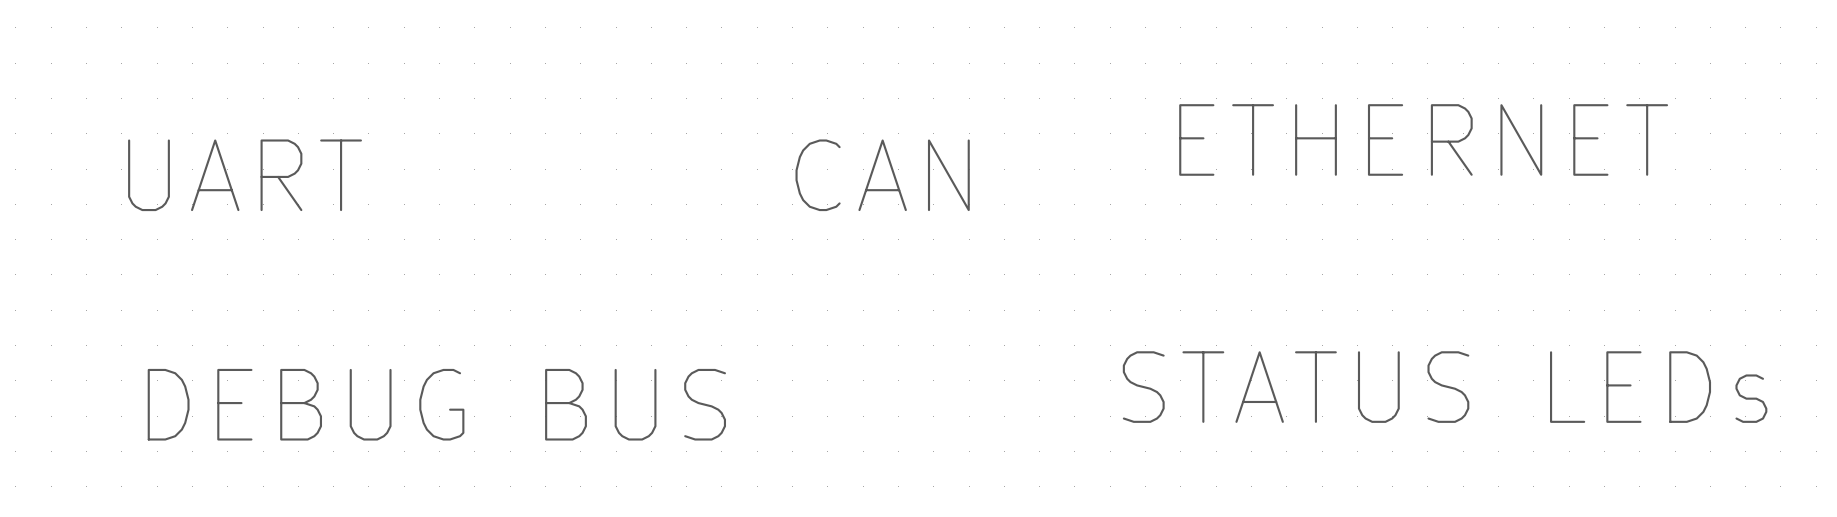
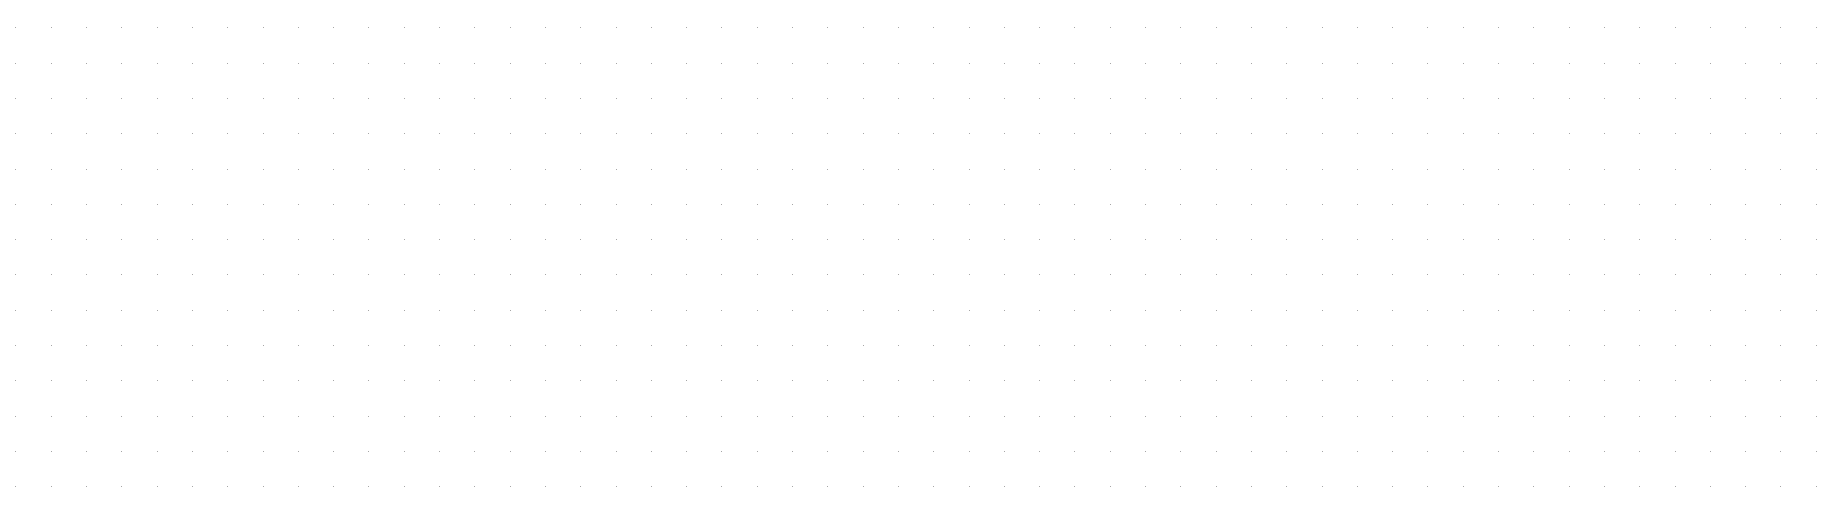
text: ETHERNET (1423, 139) -> none
text: UART (245, 175) -> none
text: CAN (882, 175) -> none
text: STATUS LEDs (1445, 387) -> none
text: DEBUG BUS (436, 404) -> none

